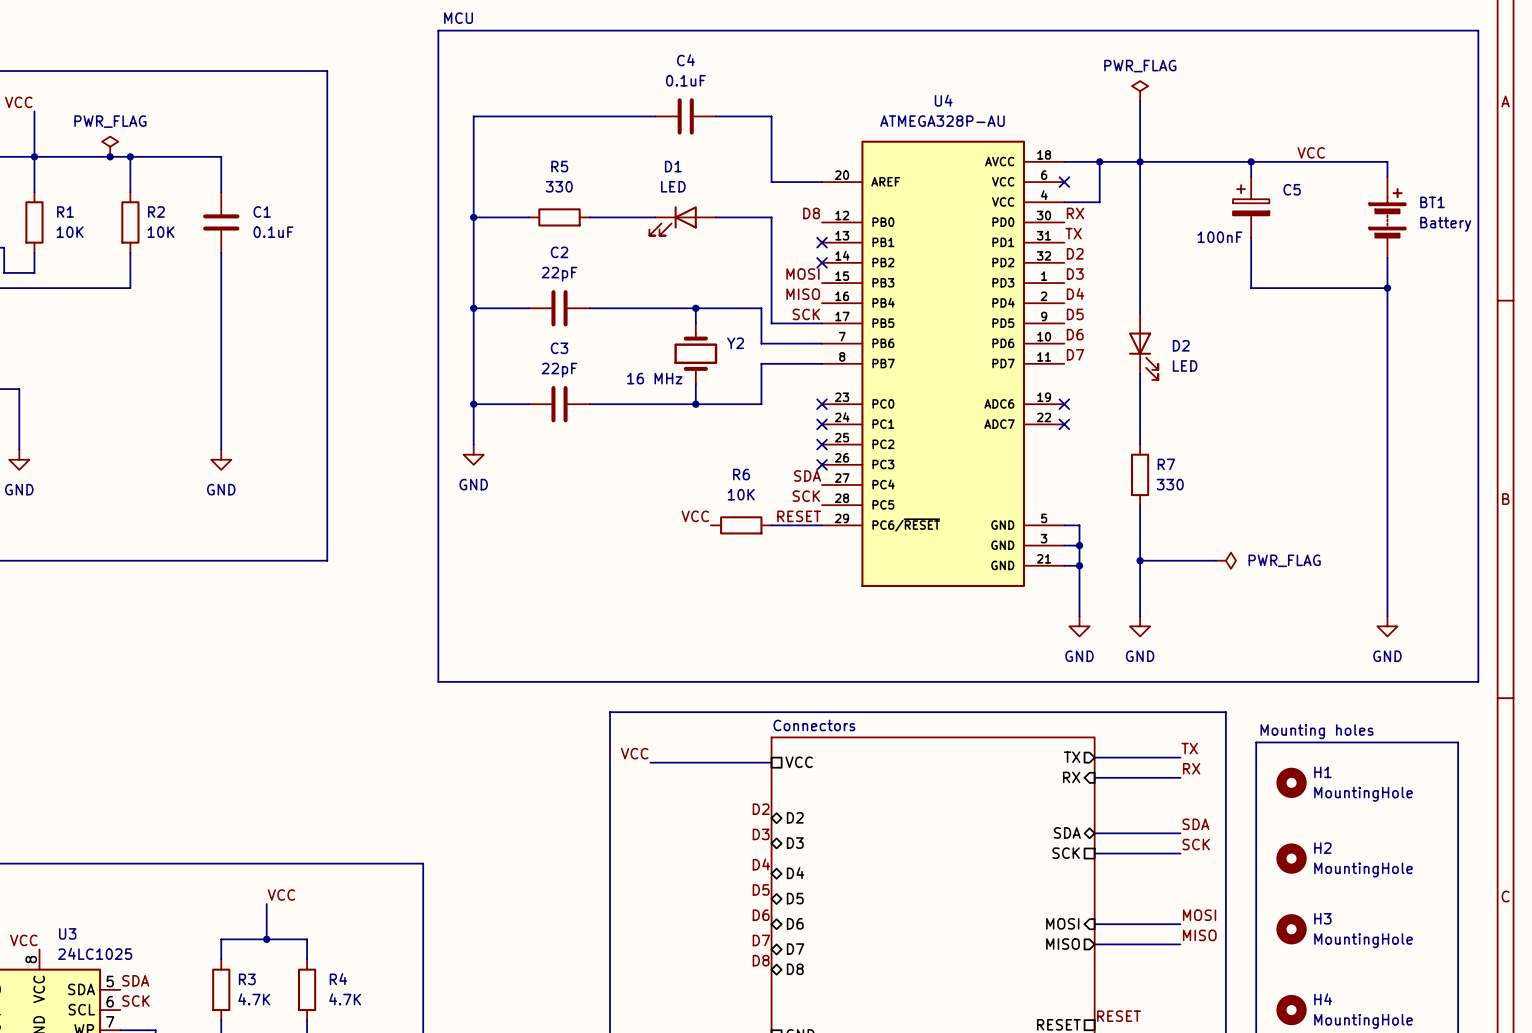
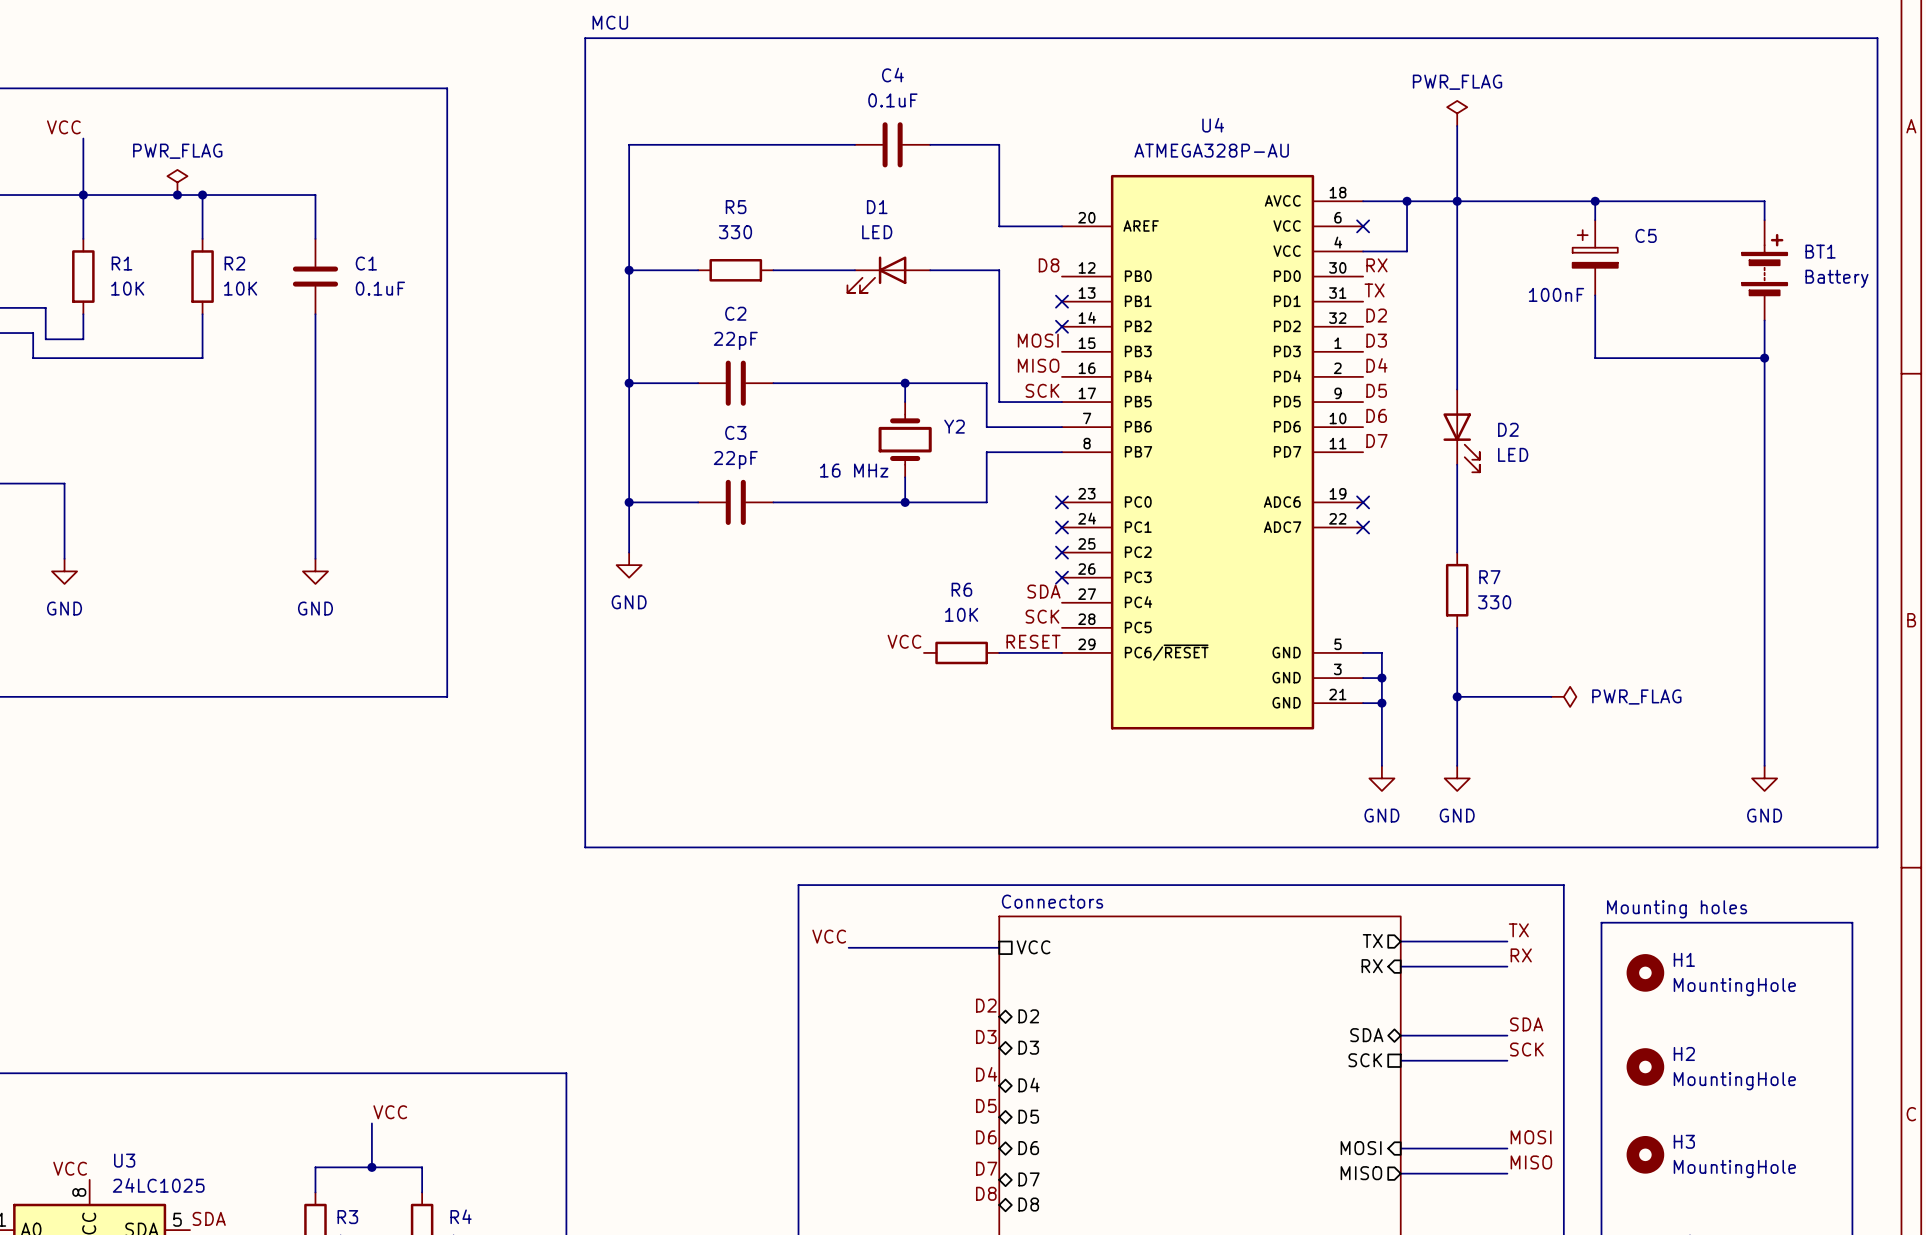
label: VCC (1311, 152) -> none

